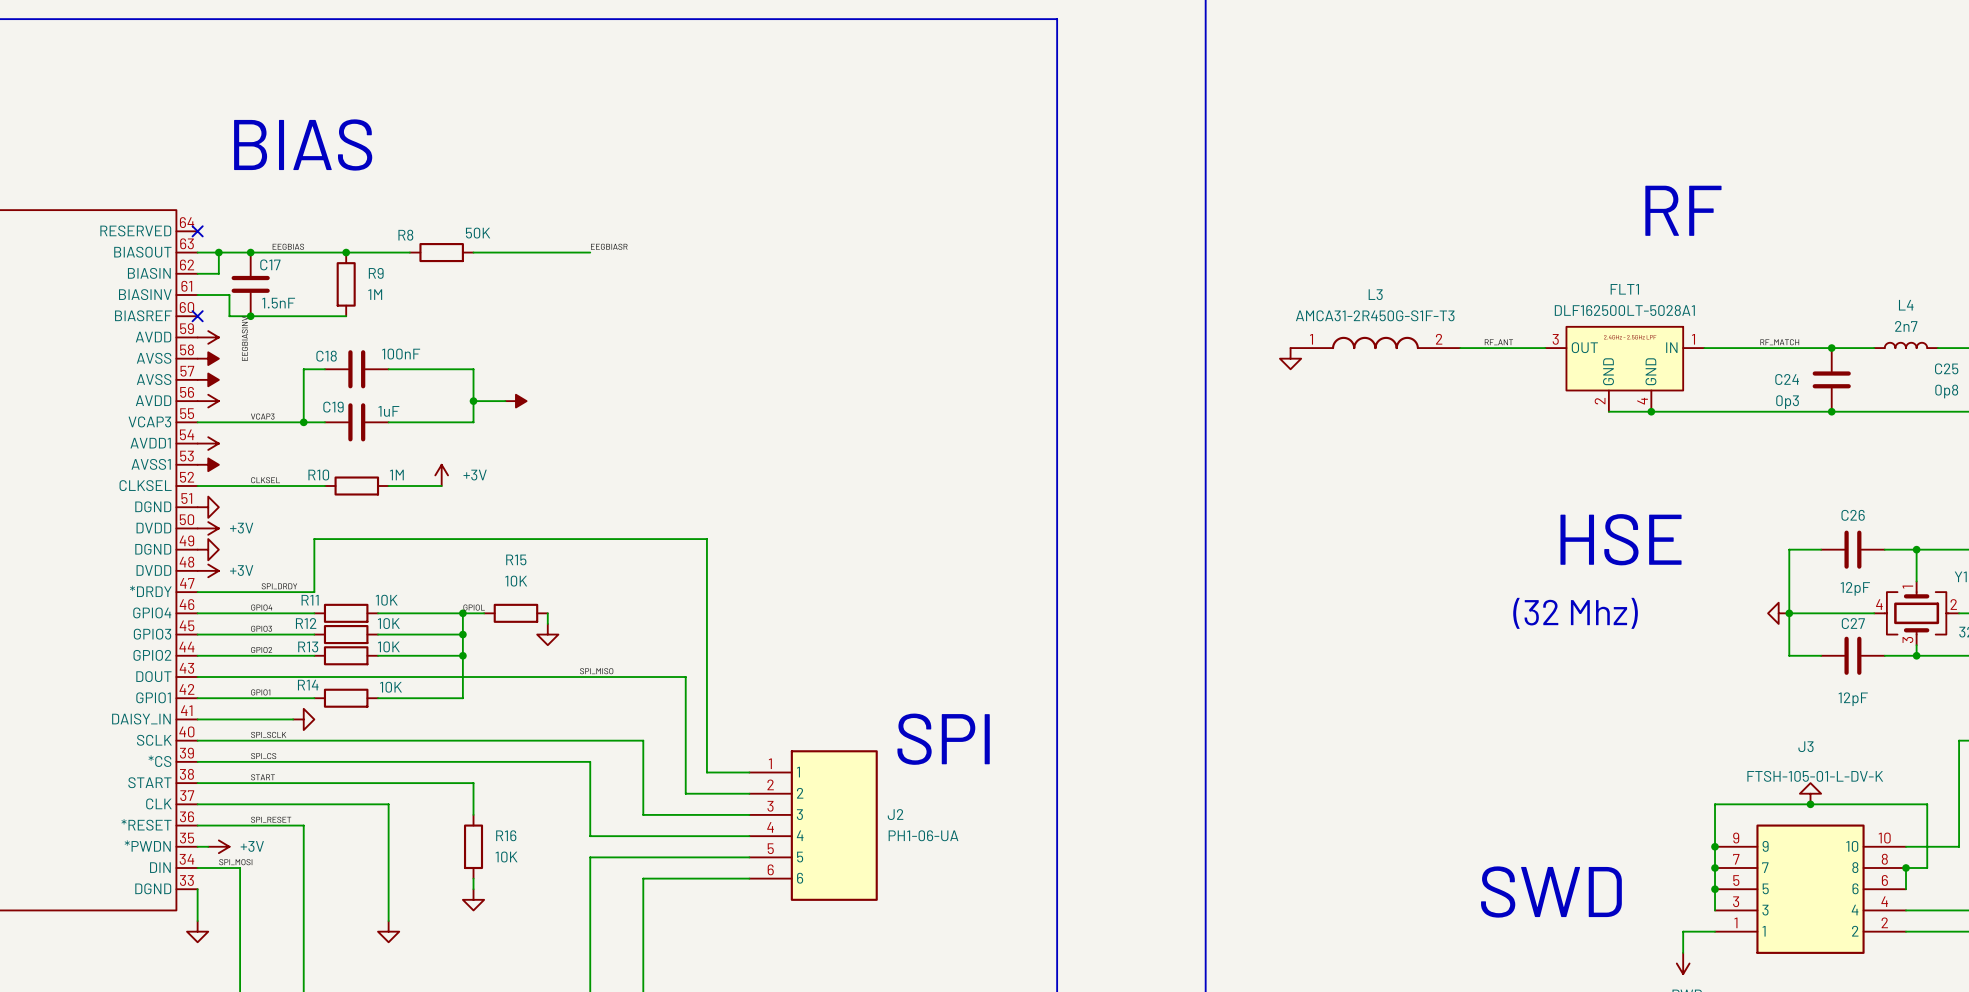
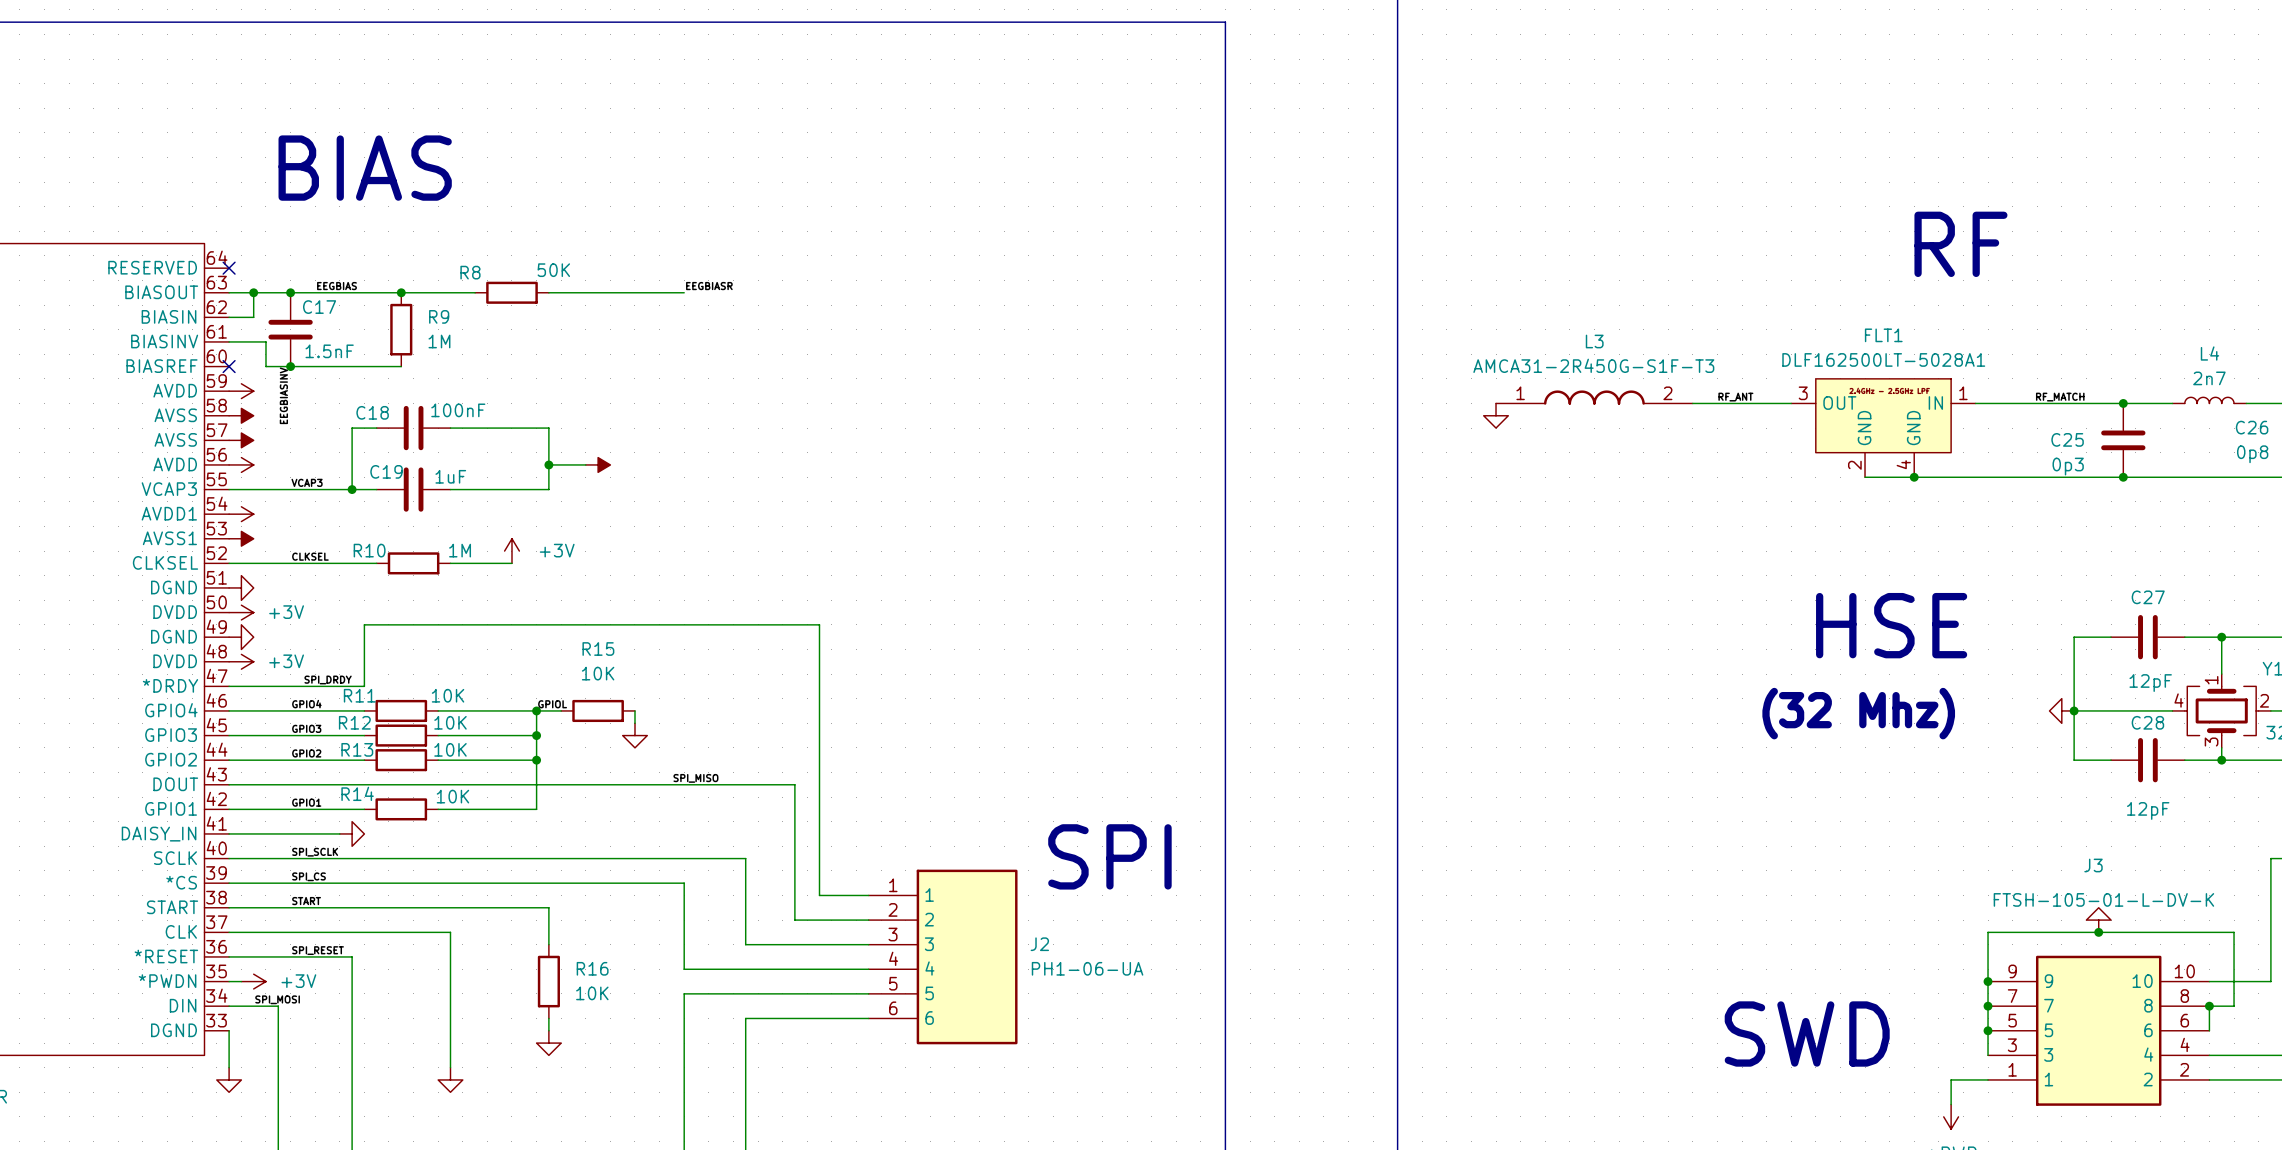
C25 name: C25 (1946, 368) -> C26 (2252, 427)
C24 name: C24 (1787, 379) -> C25 (2067, 439)
C26 name: C26 (1853, 515) -> C27 (2148, 597)
C27 name: C27 (1853, 623) -> C28 (2147, 722)

